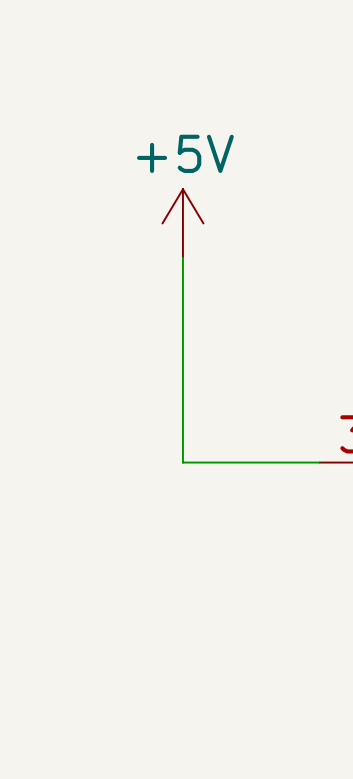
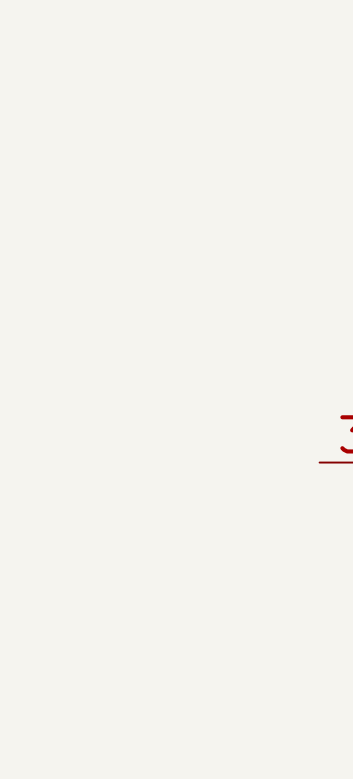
power symbol: +5V (182, 223) -> none
wire: (182, 257) (182, 462) (319, 462) -> none

